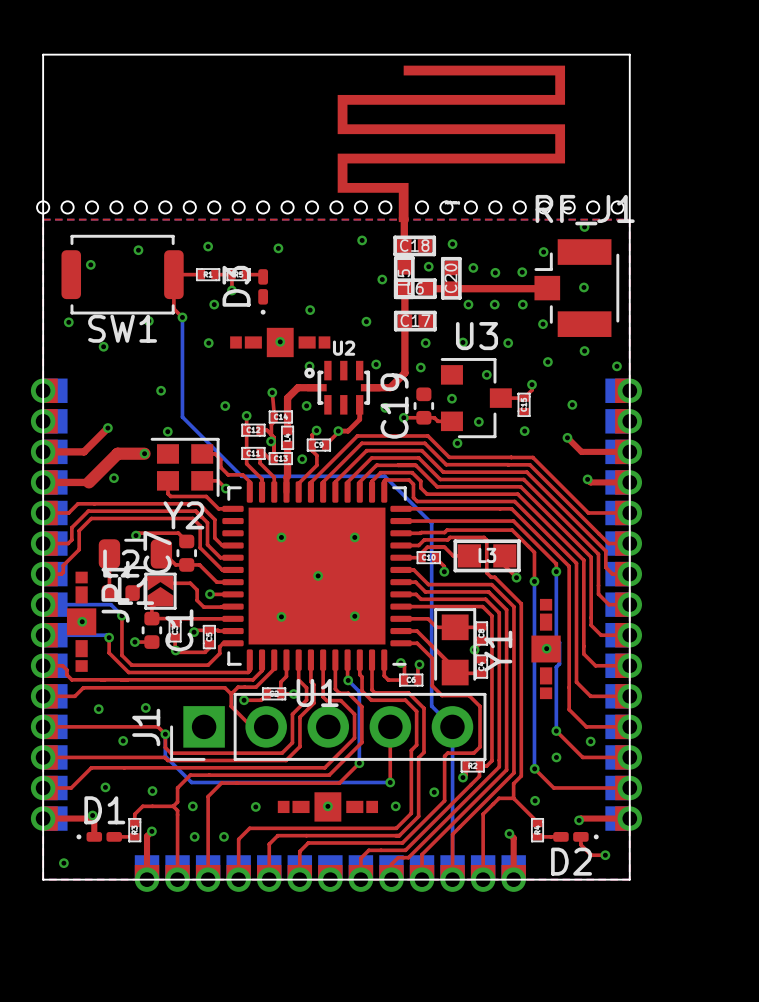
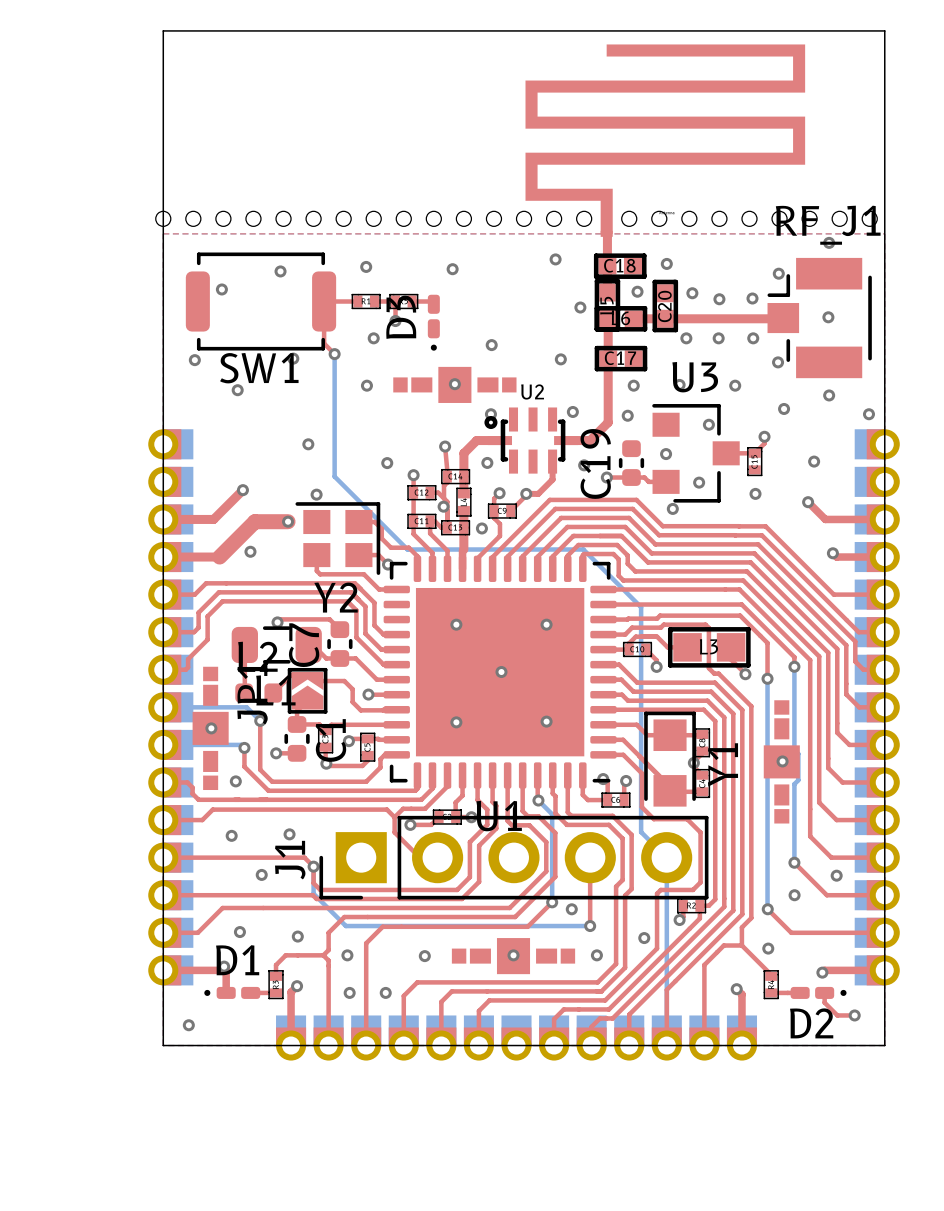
via: none -> (235, 781)
via: none -> (571, 909)

